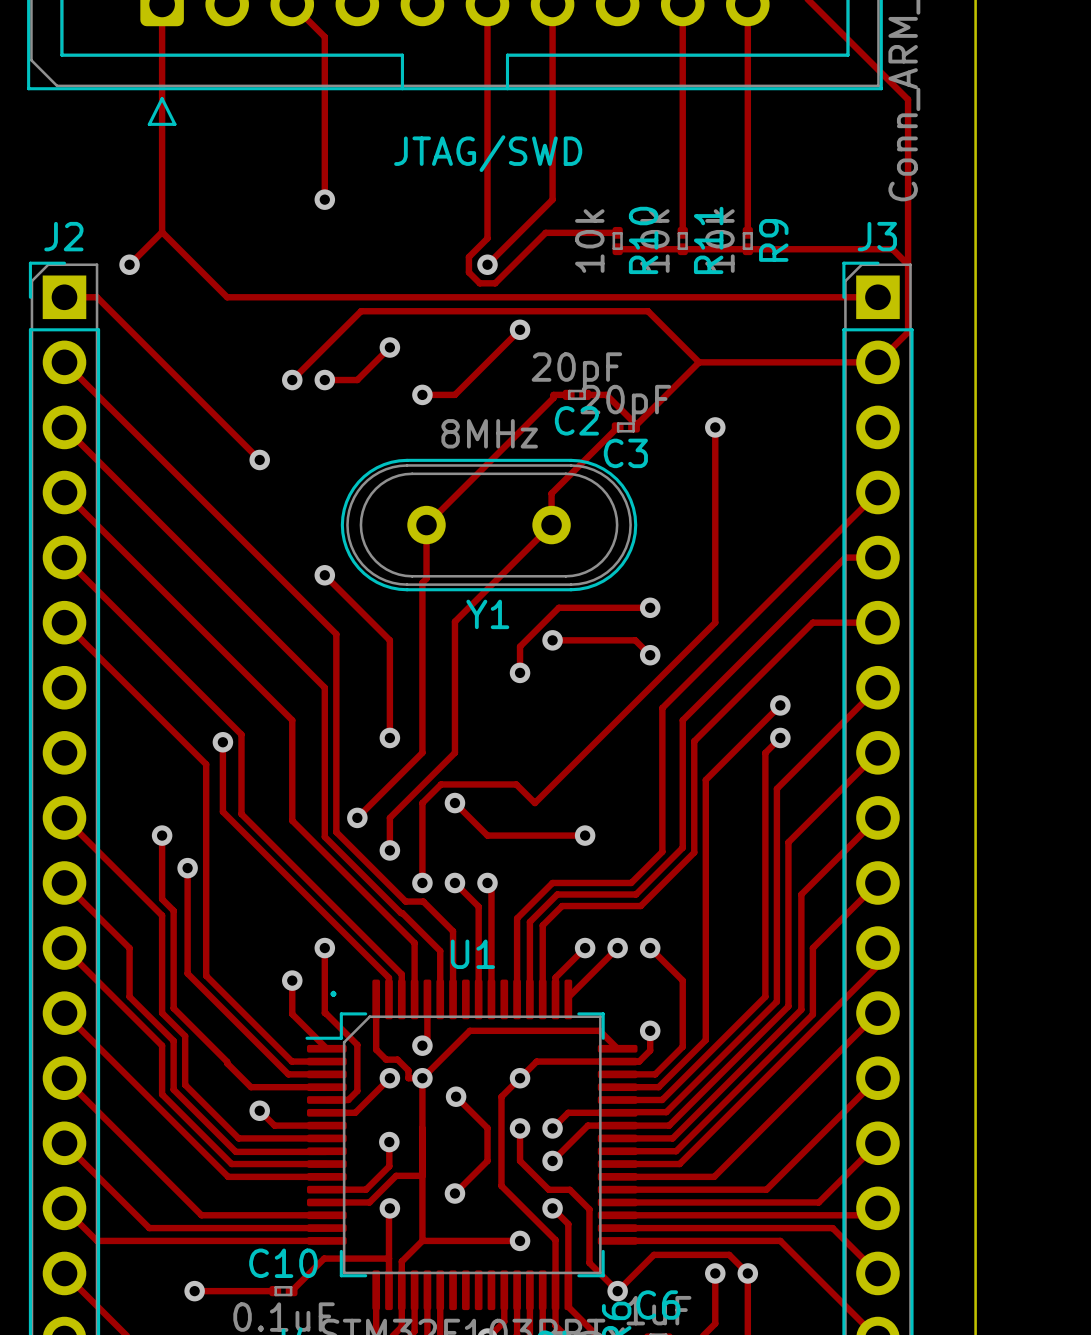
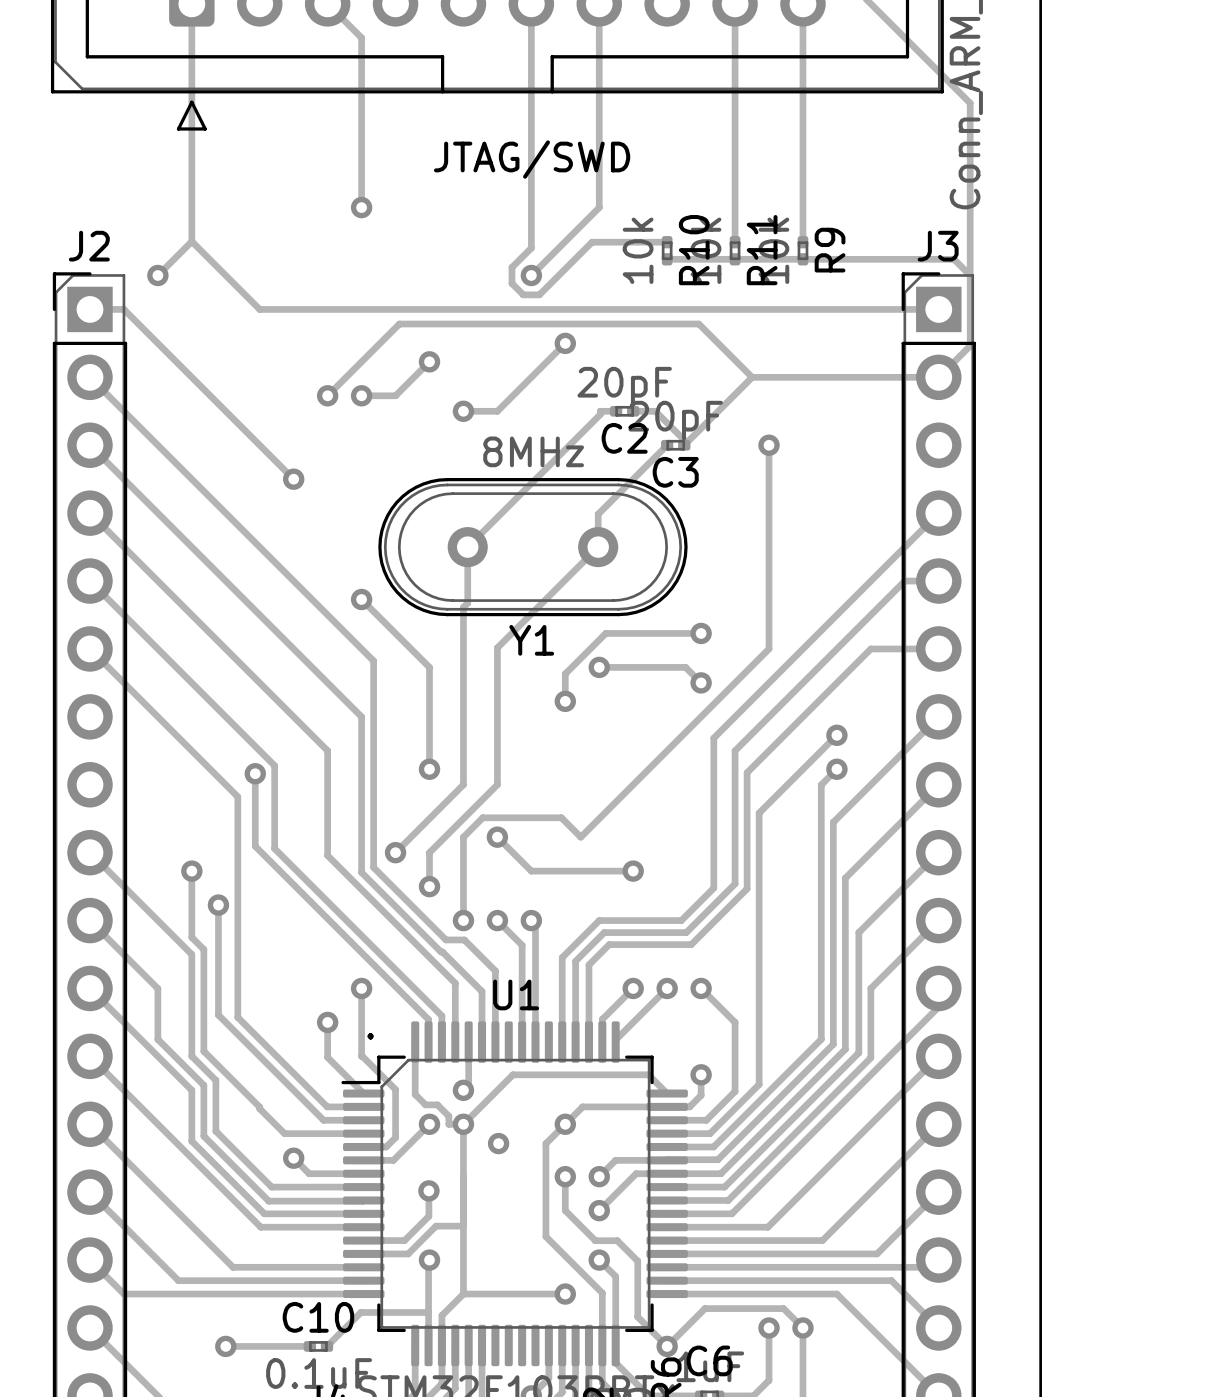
track: (456, 1096) (487, 1128) (487, 1160) (454, 1193) -> none
via: (454, 1193) -> none

